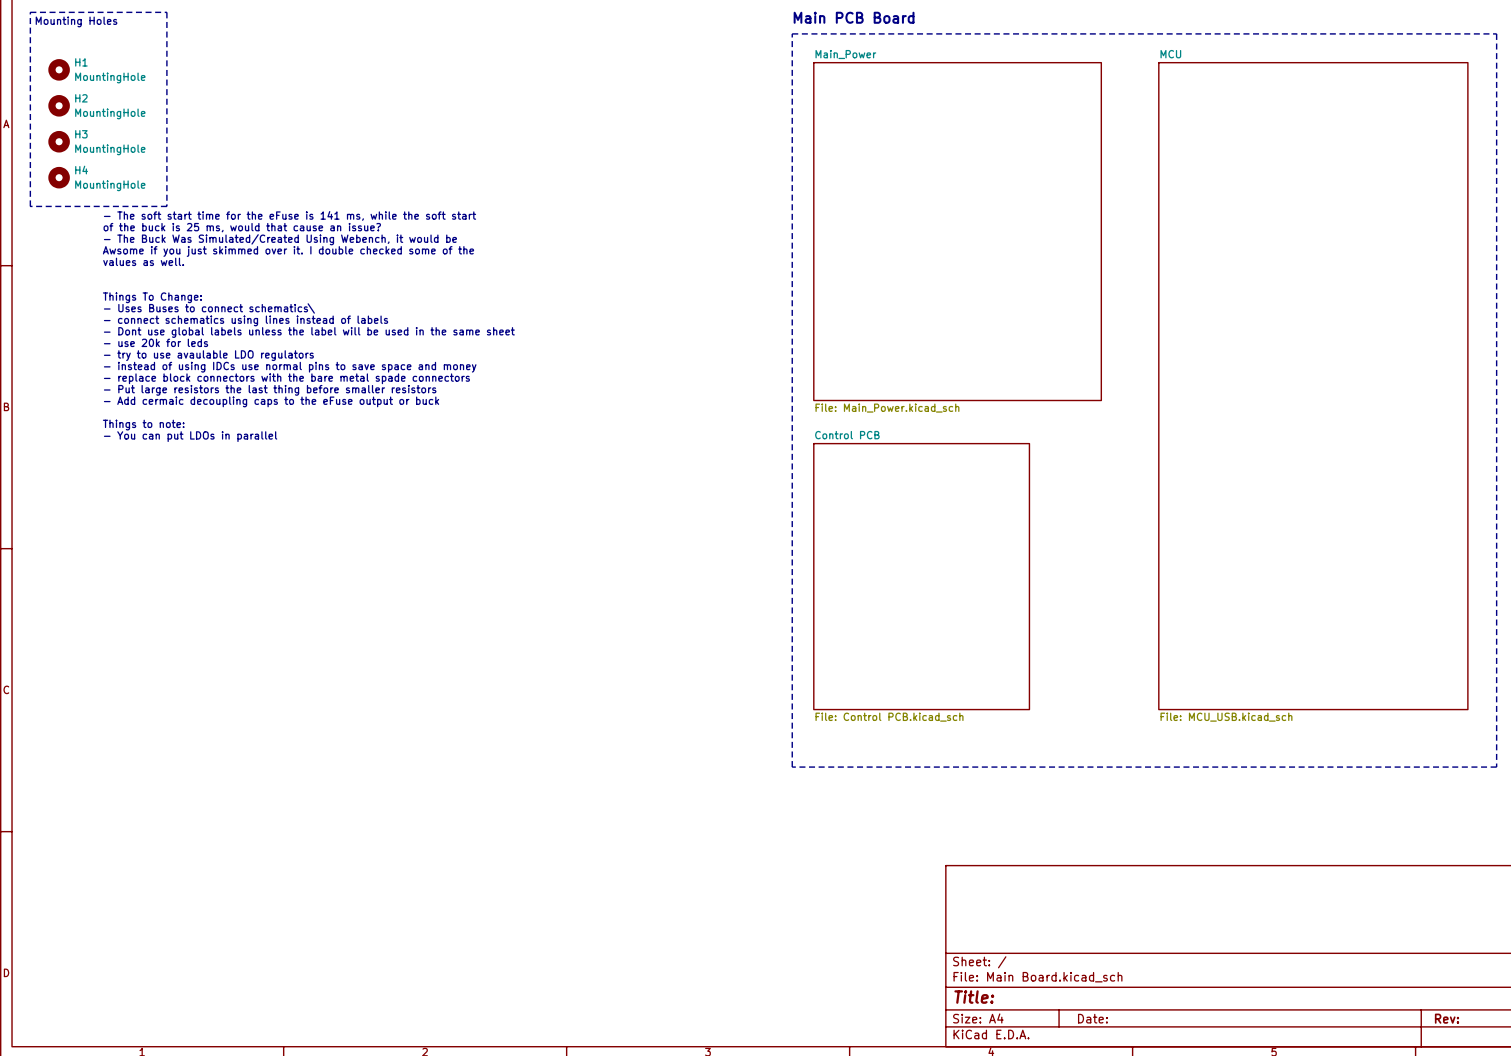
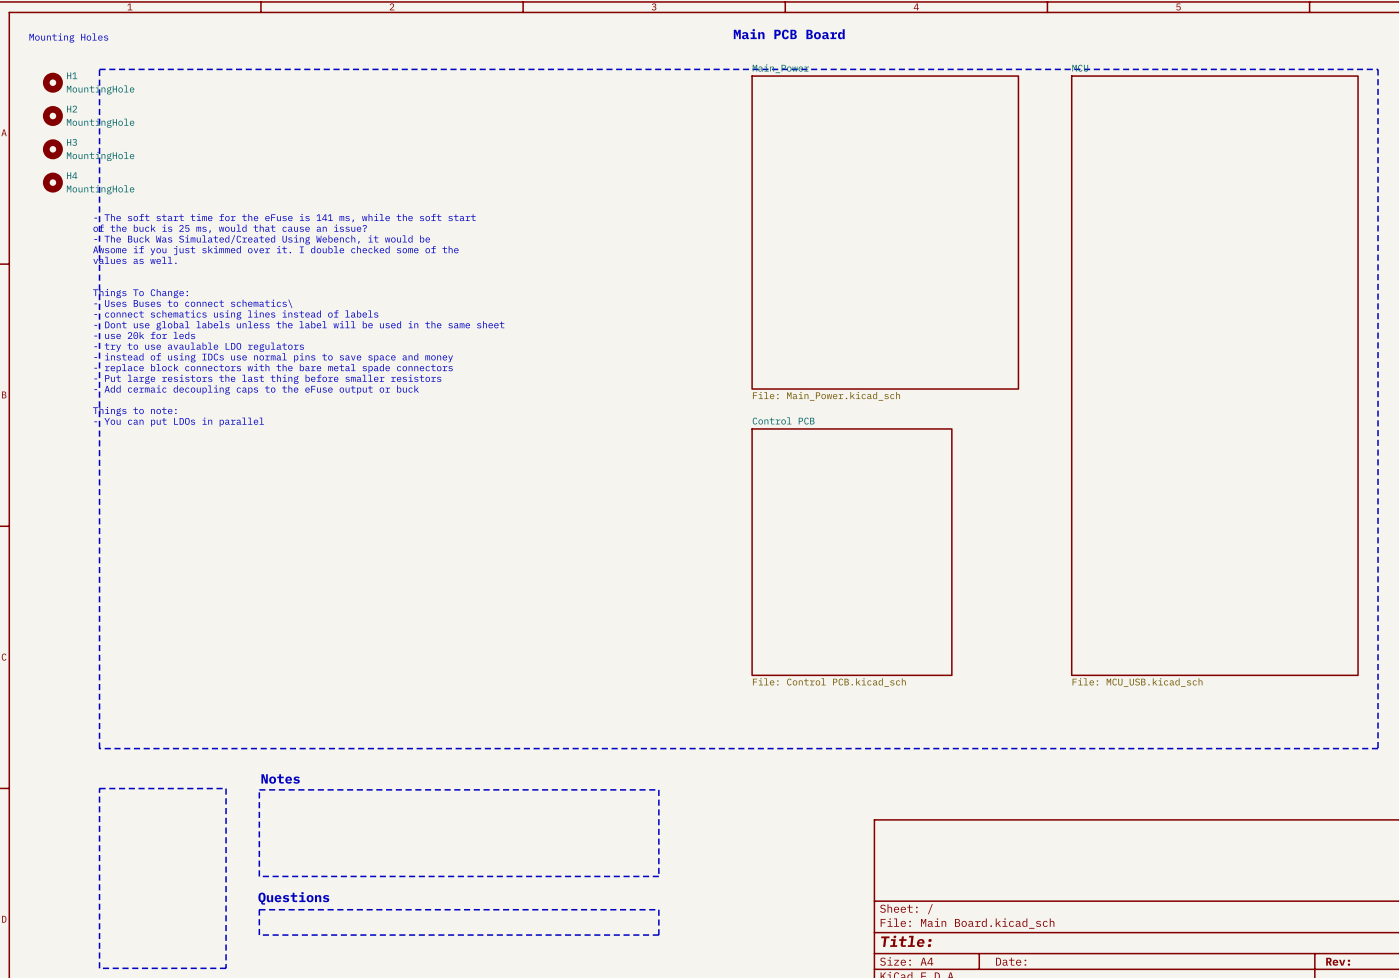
line: (30, 12) (166, 12) (166, 206) (30, 206) (30, 12) -> none
line: (792, 33) (1496, 33) (1496, 767) (792, 767) (792, 33) -> none
line: none -> (99, 69) (99, 748) (1378, 748) (1378, 69) (99, 69)
text: none -> Notes (280, 778)
line: none -> (99, 788) (226, 788) (226, 968) (99, 968) (99, 788)
line: none -> (259, 789) (259, 876) (658, 876) (658, 789) (259, 789)
text: none -> Questions (293, 898)
line: none -> (259, 909) (658, 909) (658, 935) (259, 935) (259, 909)

